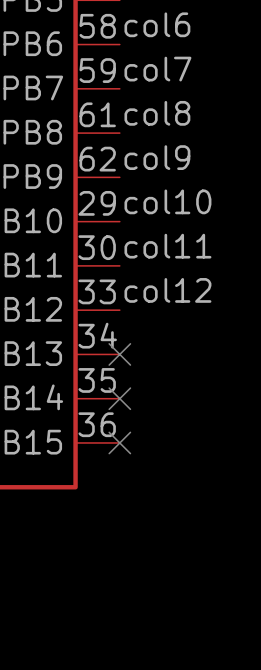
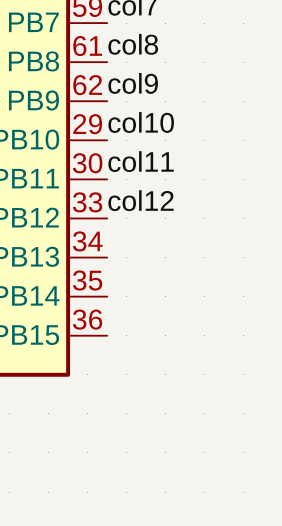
no-connect mark: (119, 354) -> none
no-connect mark: (119, 398) -> none
no-connect mark: (119, 442) -> none

